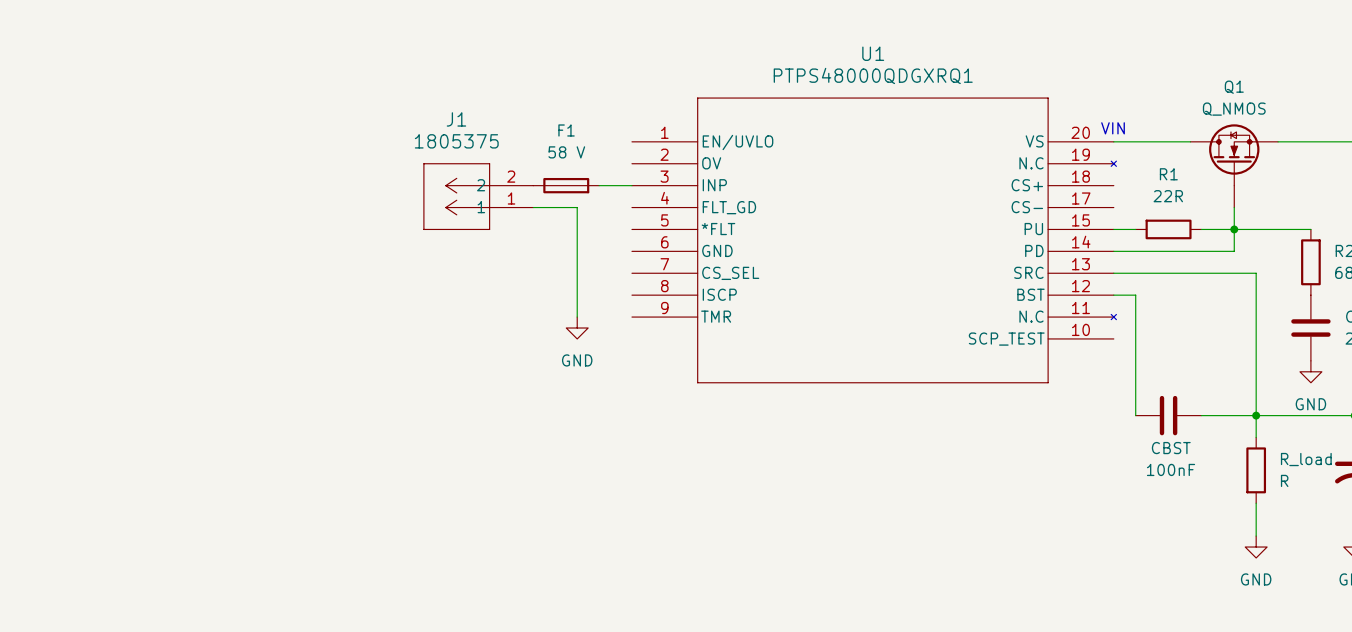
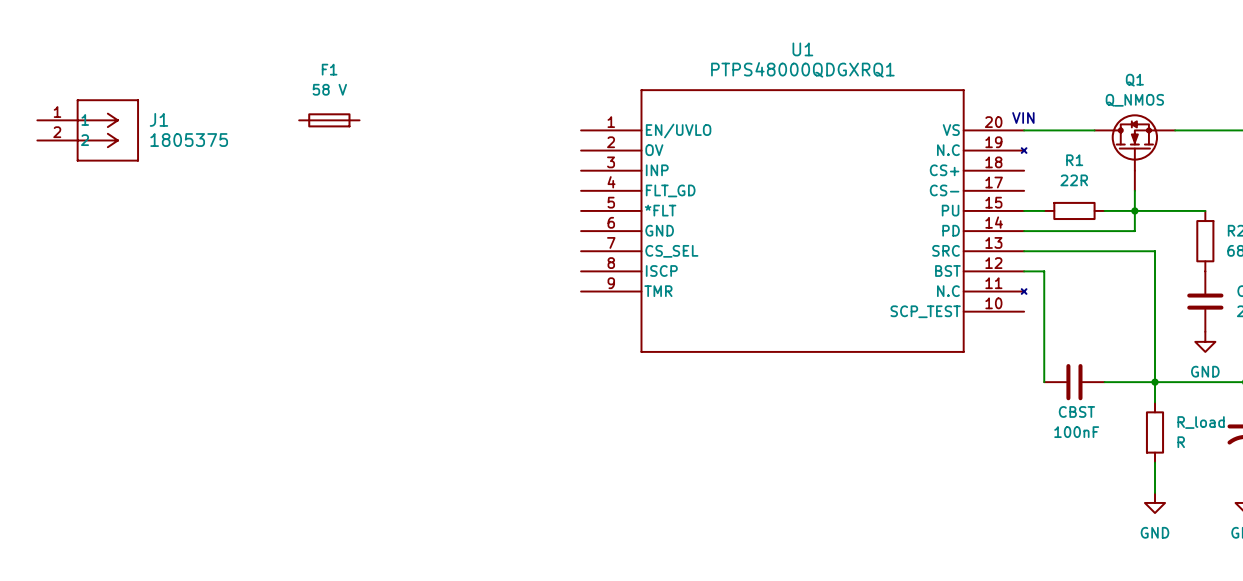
J1 name position: J1 (456, 119) -> J1 (158, 119)
J1 value position: 1805375 (456, 141) -> 1805375 (189, 140)
F1 position: (566, 185) -> (329, 120)
wire: (599, 185) (631, 185) -> none
J1 rotation: 0° (456, 196) -> 180° (107, 130)
J1 position: (478, 196) -> (87, 130)
wire: (533, 207) (577, 207) (577, 317) -> none
power symbol: GND (577, 328) -> none

